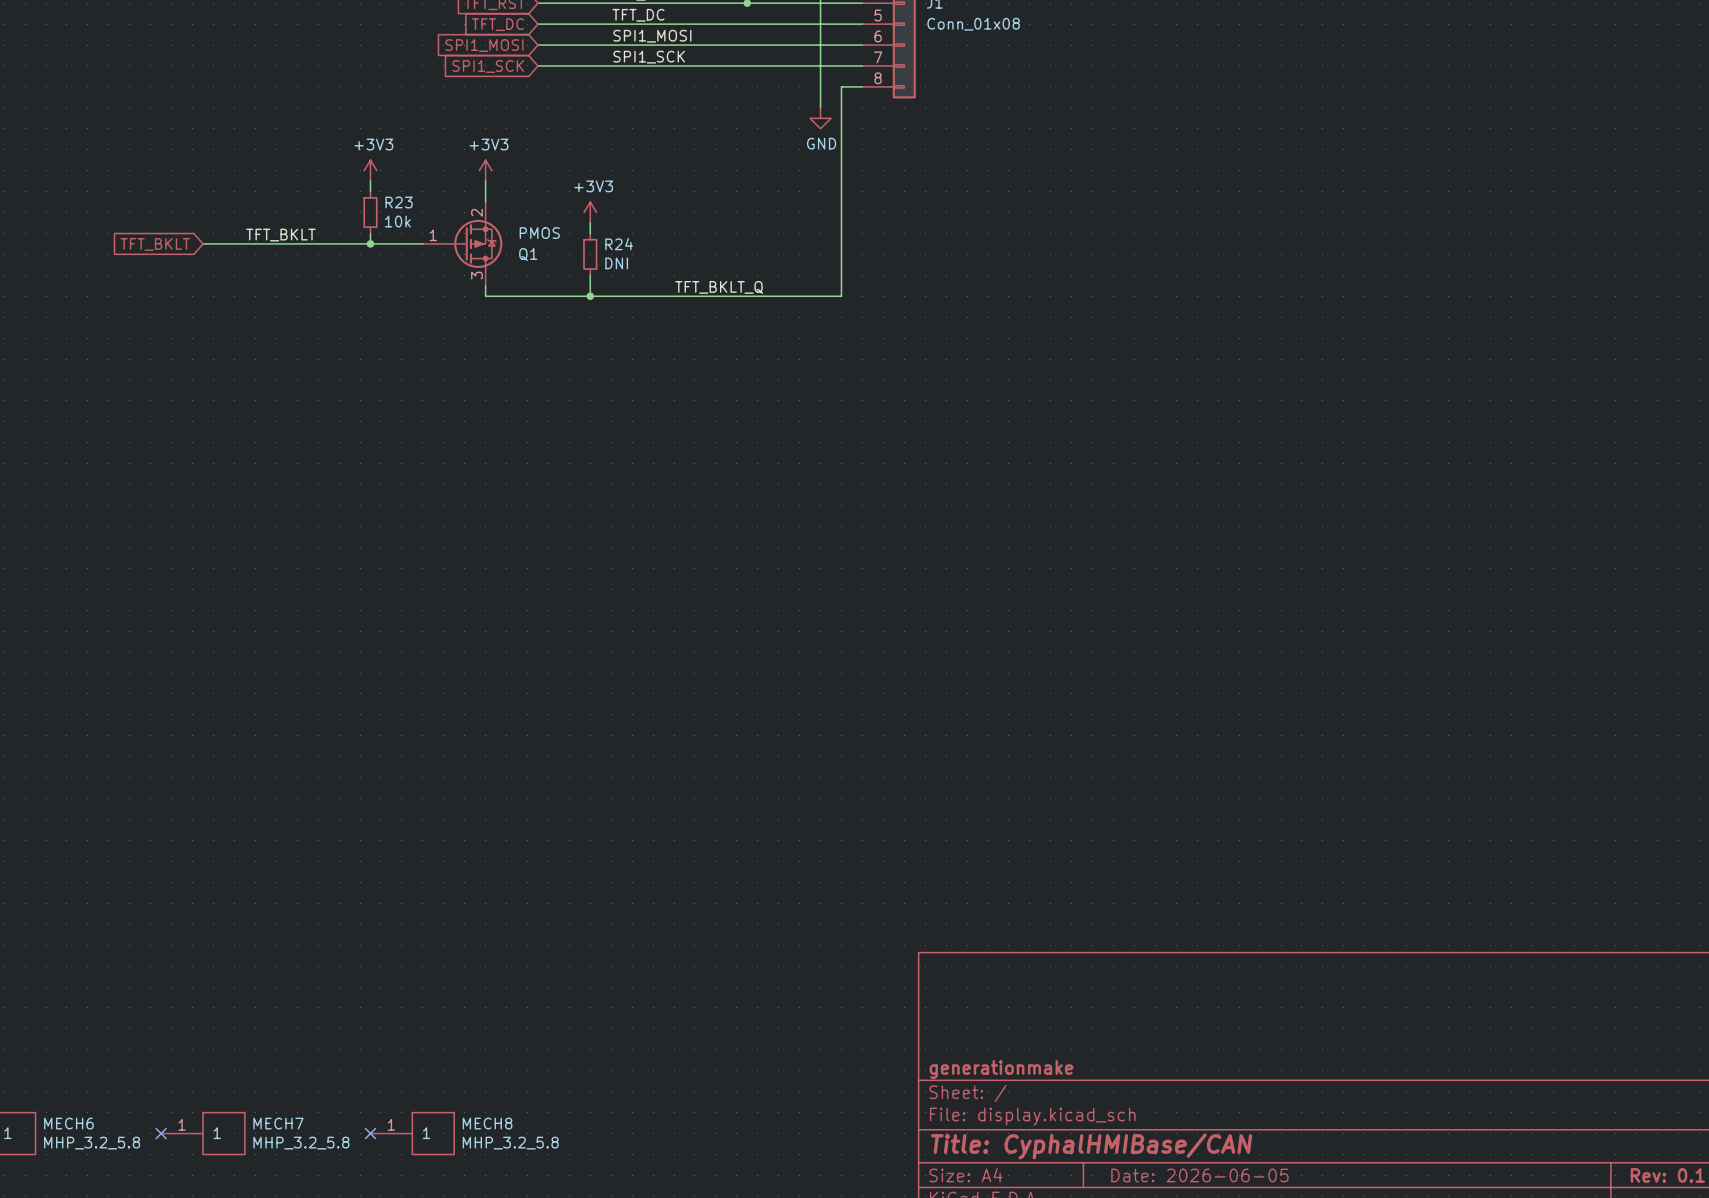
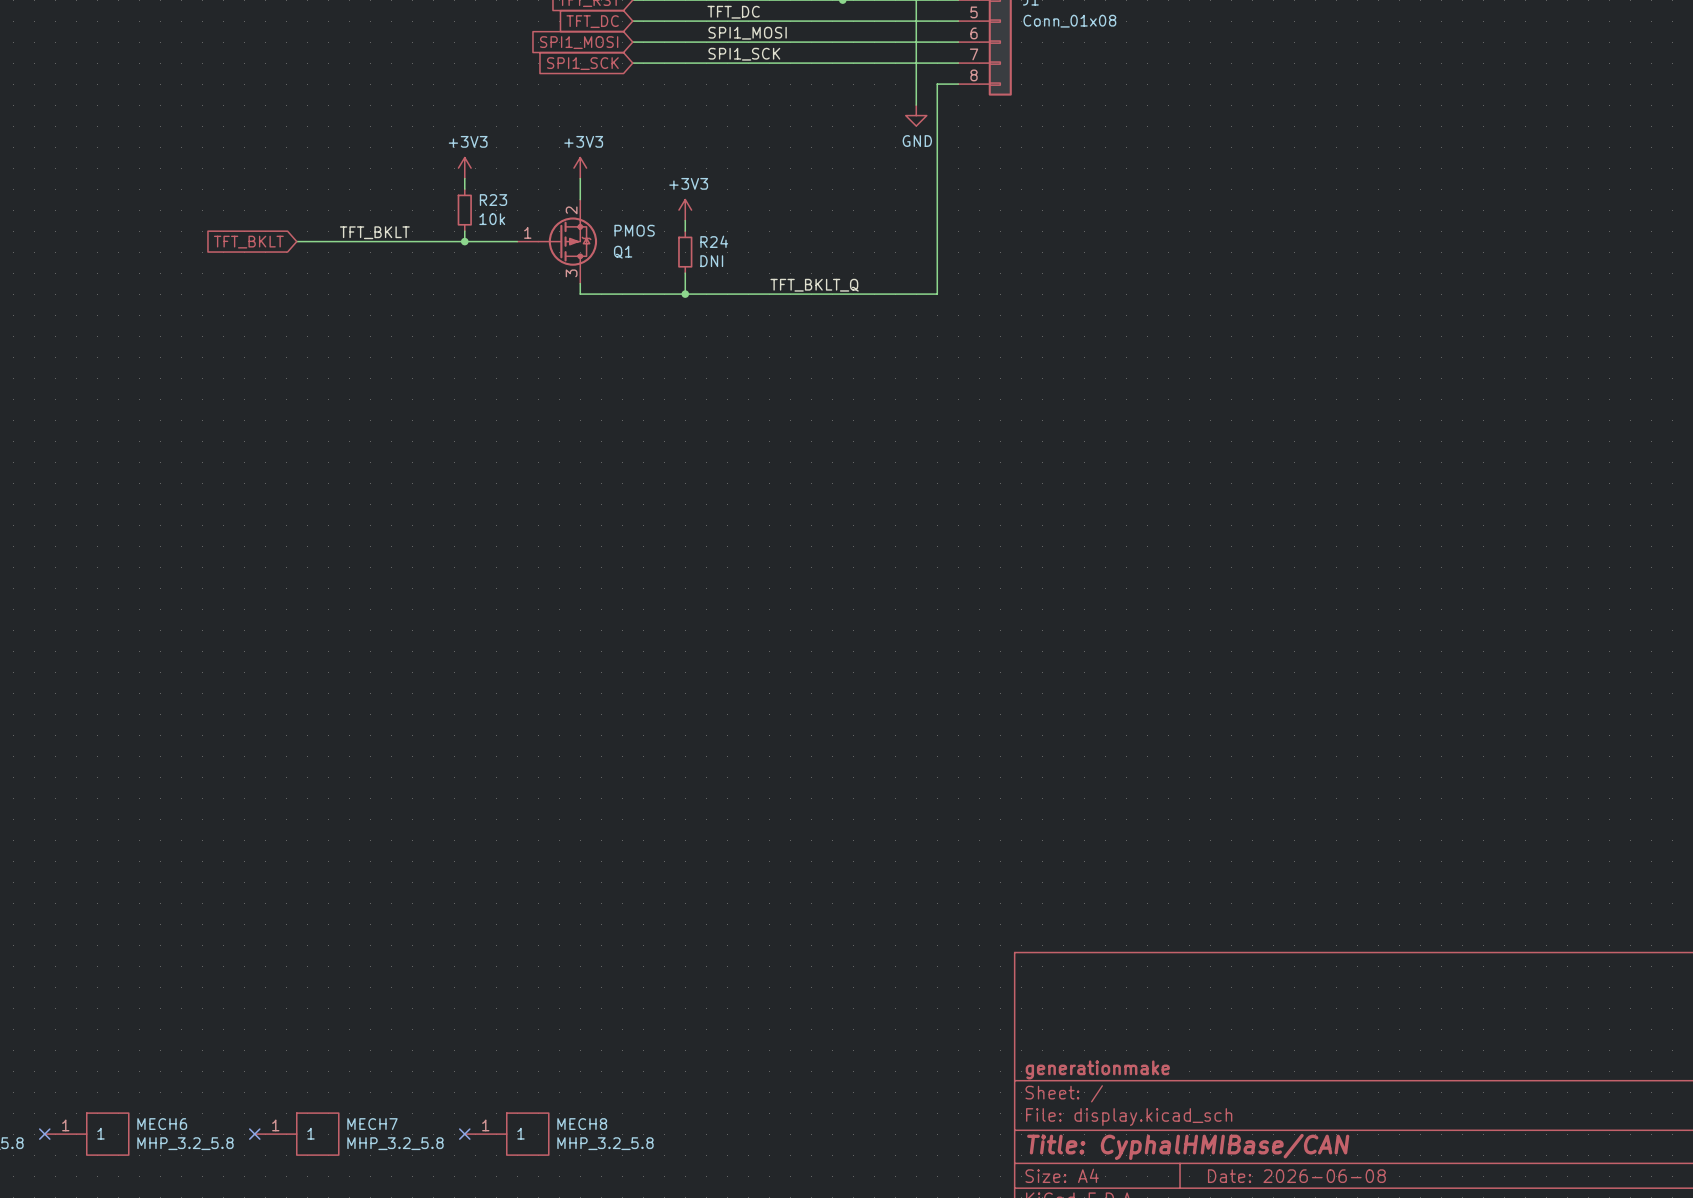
title block: Date: 2026-06-05 (1199, 1175) -> Date: 2026-06-08 (1296, 1176)

